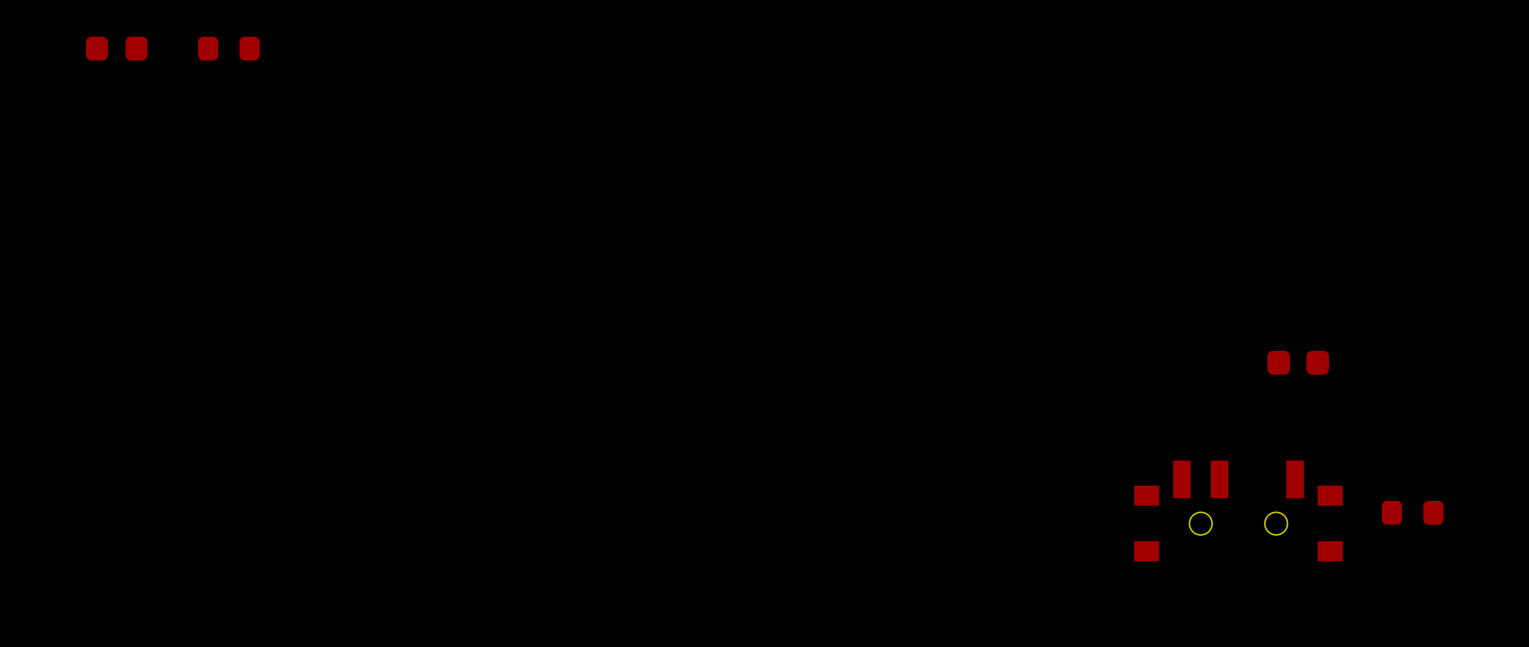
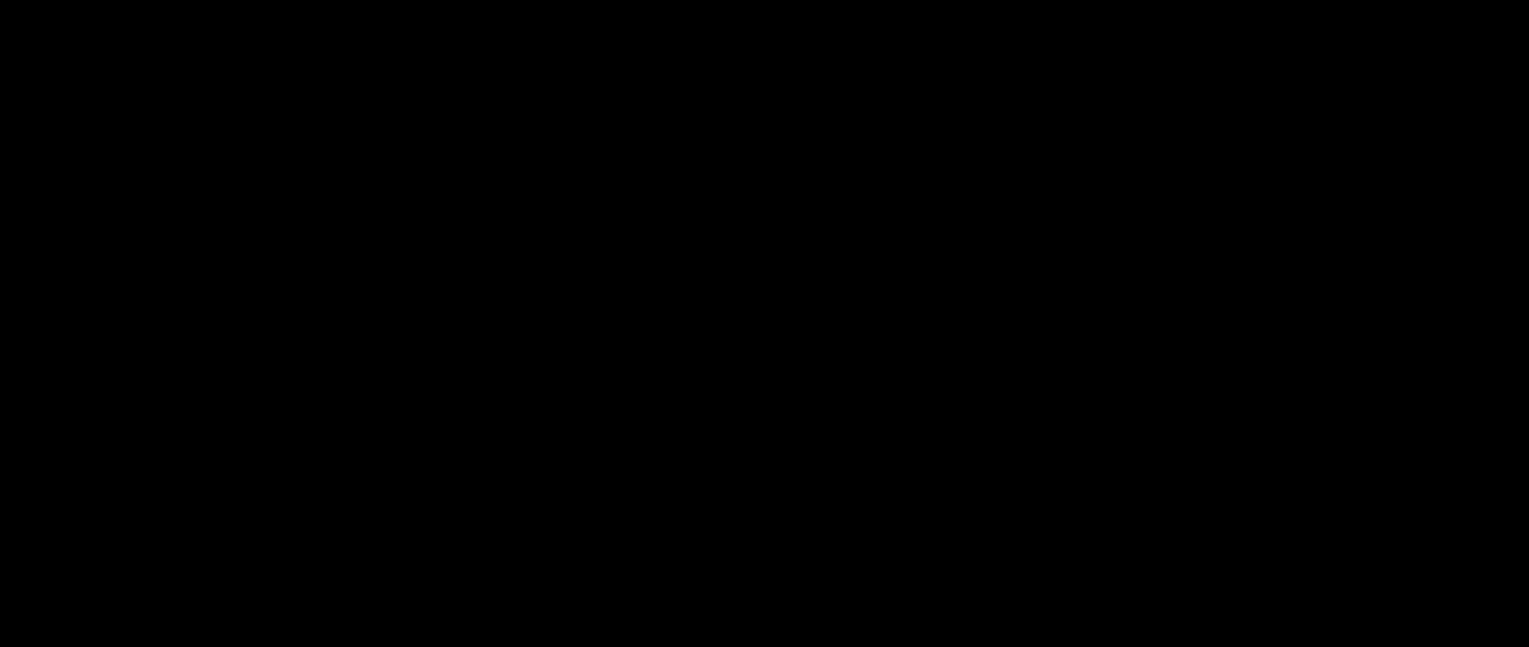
part: (116, 48) -> none
part: (228, 48) -> none
part: (1298, 362) -> none
part: (1238, 510) -> none
part: (1412, 512) -> none

